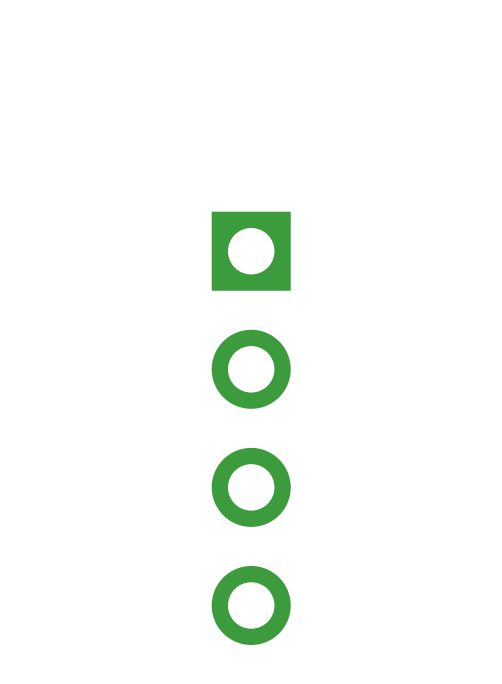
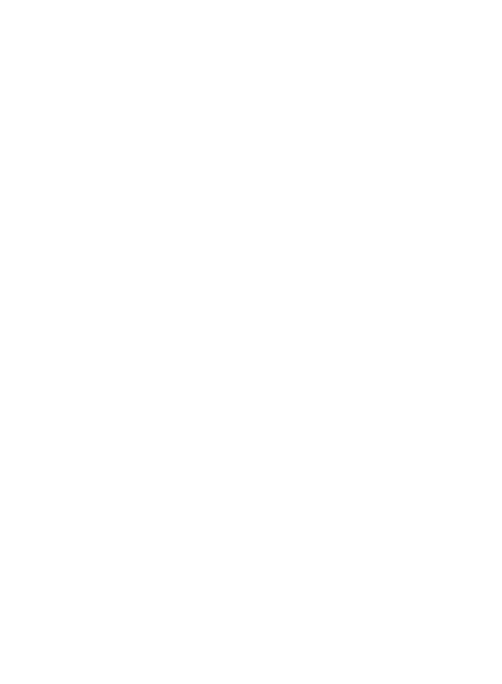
part: (251, 428) -> none

